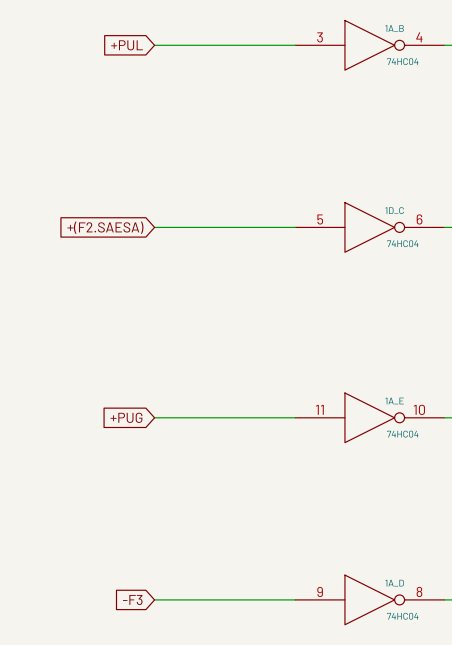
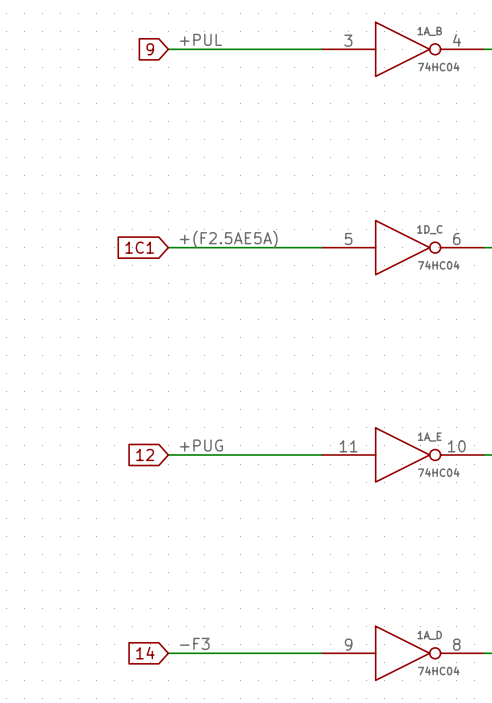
label: none -> +PUL (200, 39)
global label: +PUL (127, 45) -> 9 (150, 49)
label: none -> +(F2.5AE5A) (228, 239)
global label: +(F2.SAESA) (105, 227) -> 1C1 (139, 247)
label: none -> +PUG (201, 445)
global label: +PUG (126, 417) -> 12 (145, 454)
label: none -> -F3 (194, 643)
global label: -F3 (132, 599) -> 14 (145, 653)

